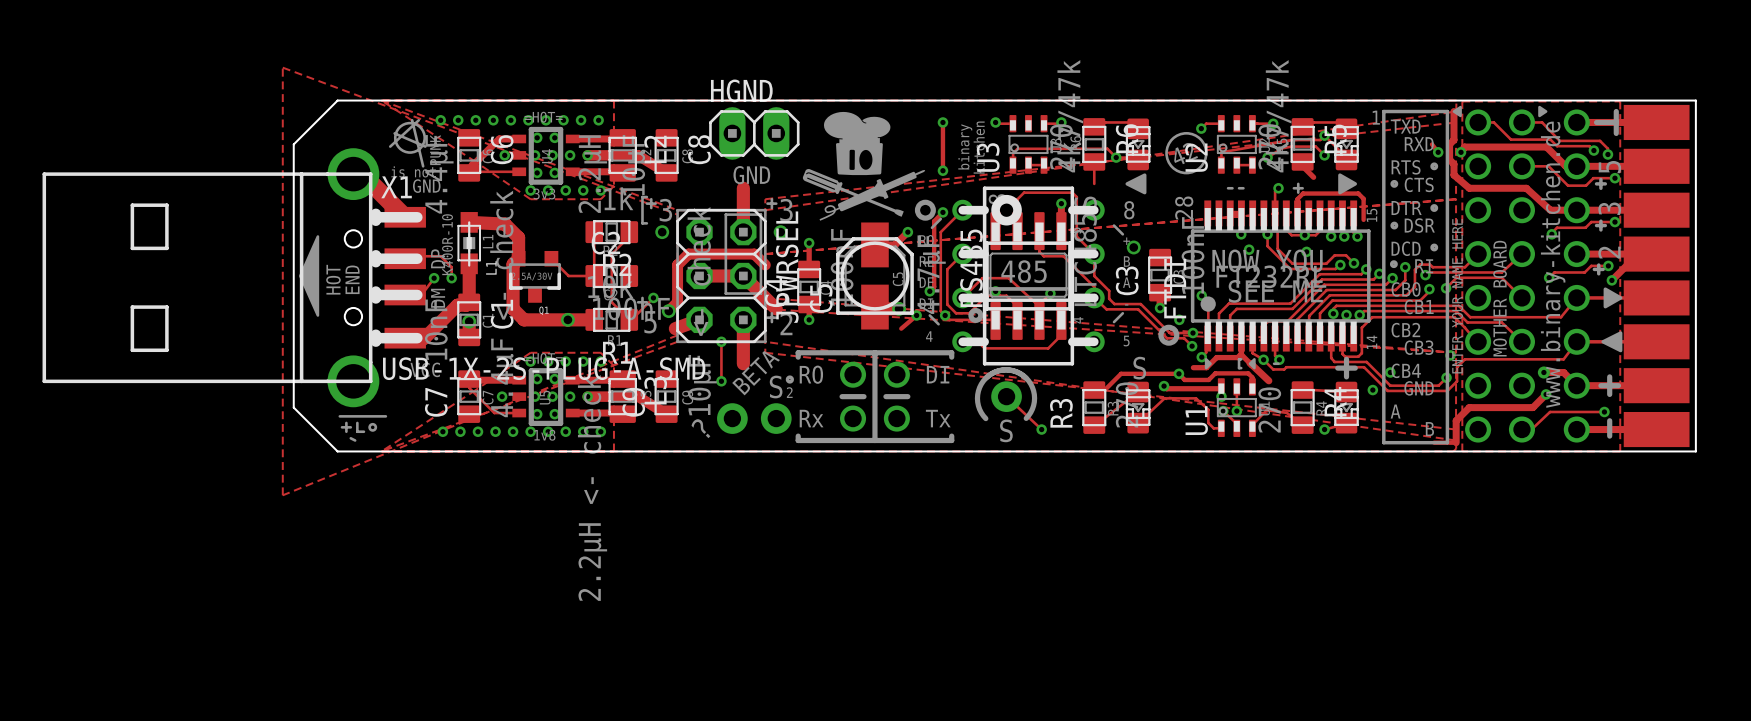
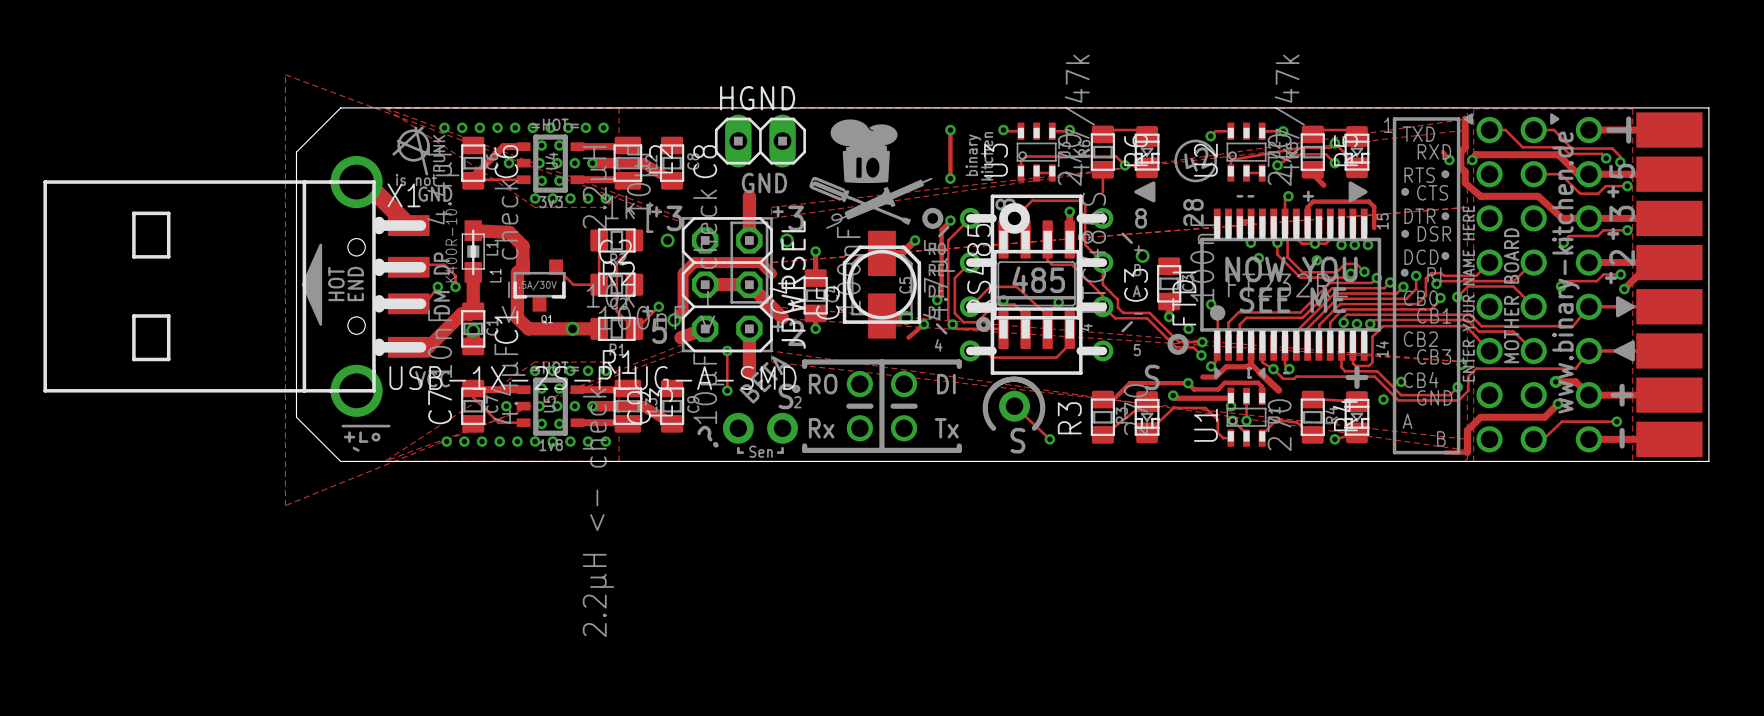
line: none -> (738, 448) (738, 452) (742, 452)
line: none -> (782, 448) (782, 452) (778, 452)
text: none -> Sen (761, 451)

